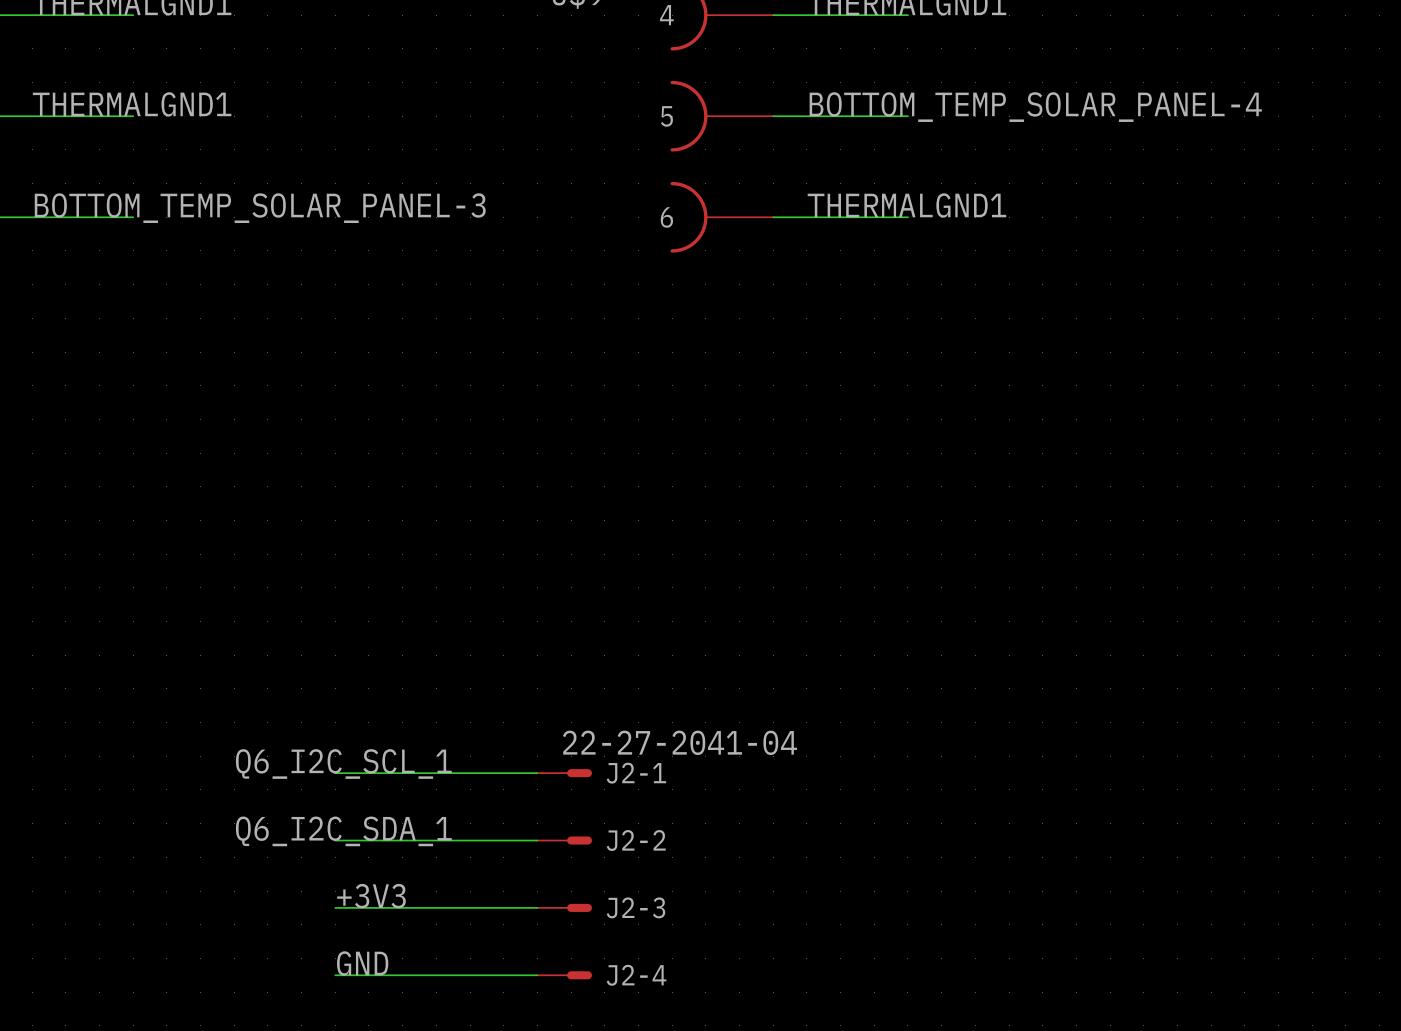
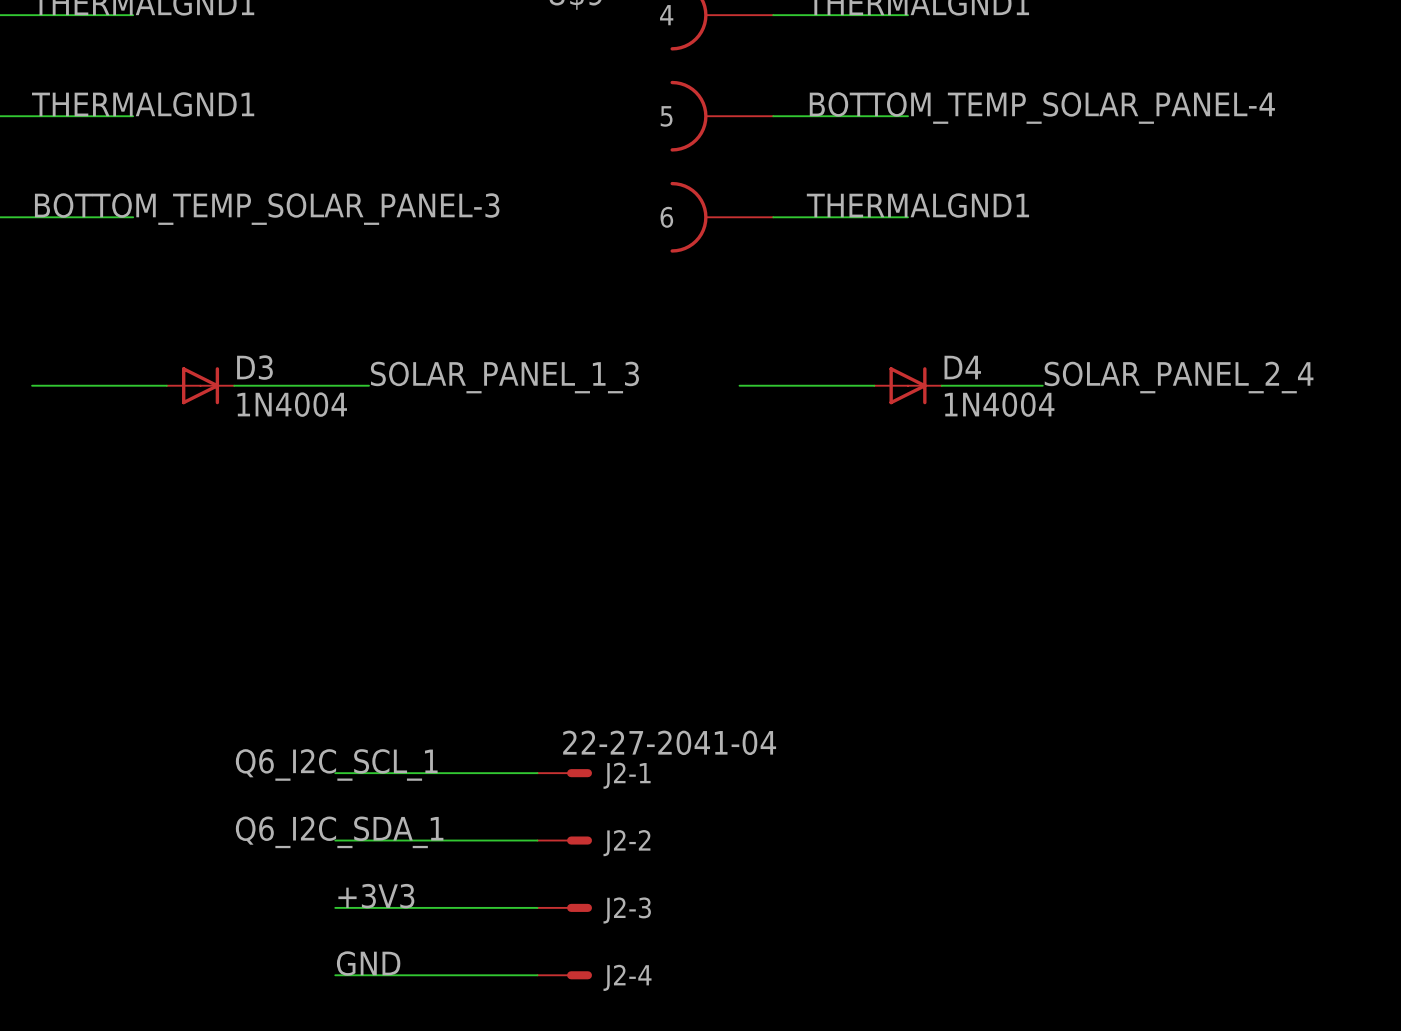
label: none -> SOLAR_PANEL_1_3 (504, 377)
label: none -> SOLAR_PANEL_2_4 (1179, 377)
wire: none -> (32, 385) (166, 385)
D3: none -> 1N4004 (200, 385)
wire: none -> (234, 385) (368, 385)
wire: none -> (739, 385) (874, 385)
D4: none -> 1N4004 (907, 385)
wire: none -> (941, 385) (1042, 385)

